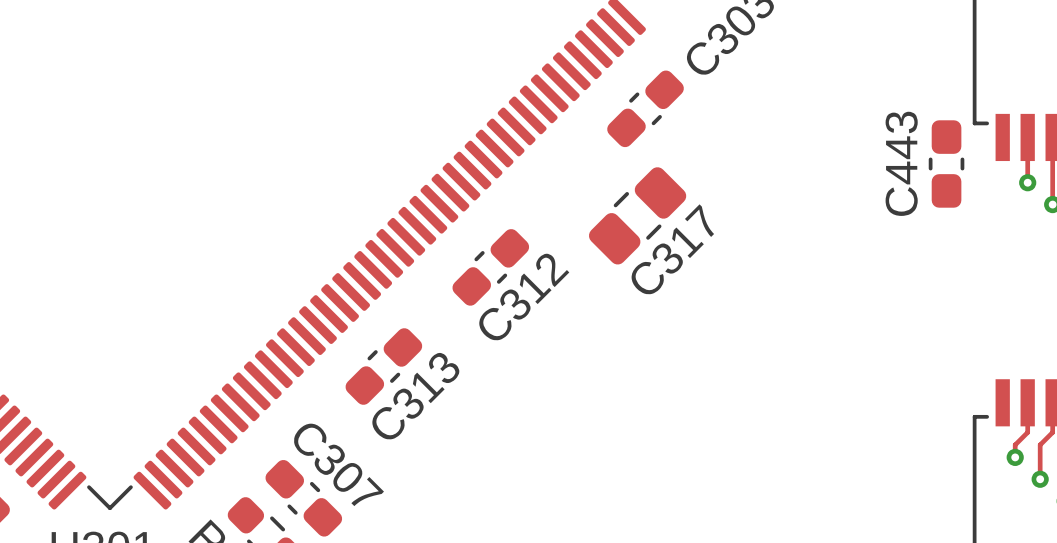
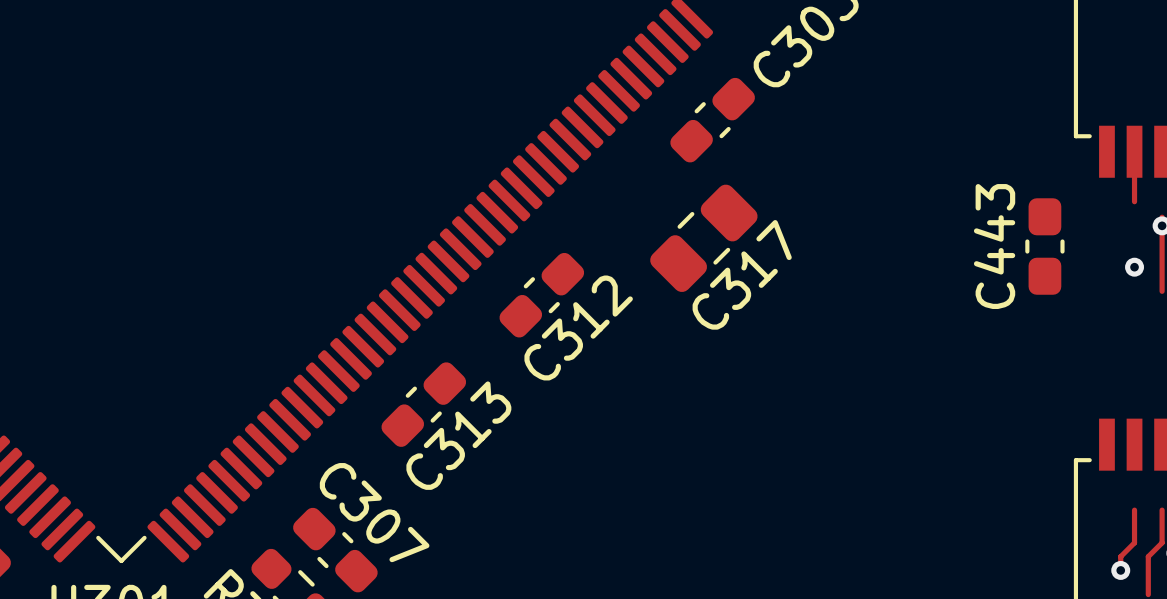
track: (1052, 137) (1052, 196) -> (1162, 225) (1162, 291)
C443 position: (946, 163) -> (1044, 246)
via: (1027, 182) -> none
via: none -> (1134, 267)
track: (1027, 402) (1027, 432) (1015, 444) (1015, 457) -> (1134, 510) (1134, 542) (1120, 556) (1120, 570)
track: (1052, 402) (1052, 432) (1040, 444) (1040, 479) -> (1162, 510) (1162, 542) (1148, 556) (1148, 594)
via: (1015, 457) -> none
via: (1040, 479) -> none
via: none -> (1120, 570)

